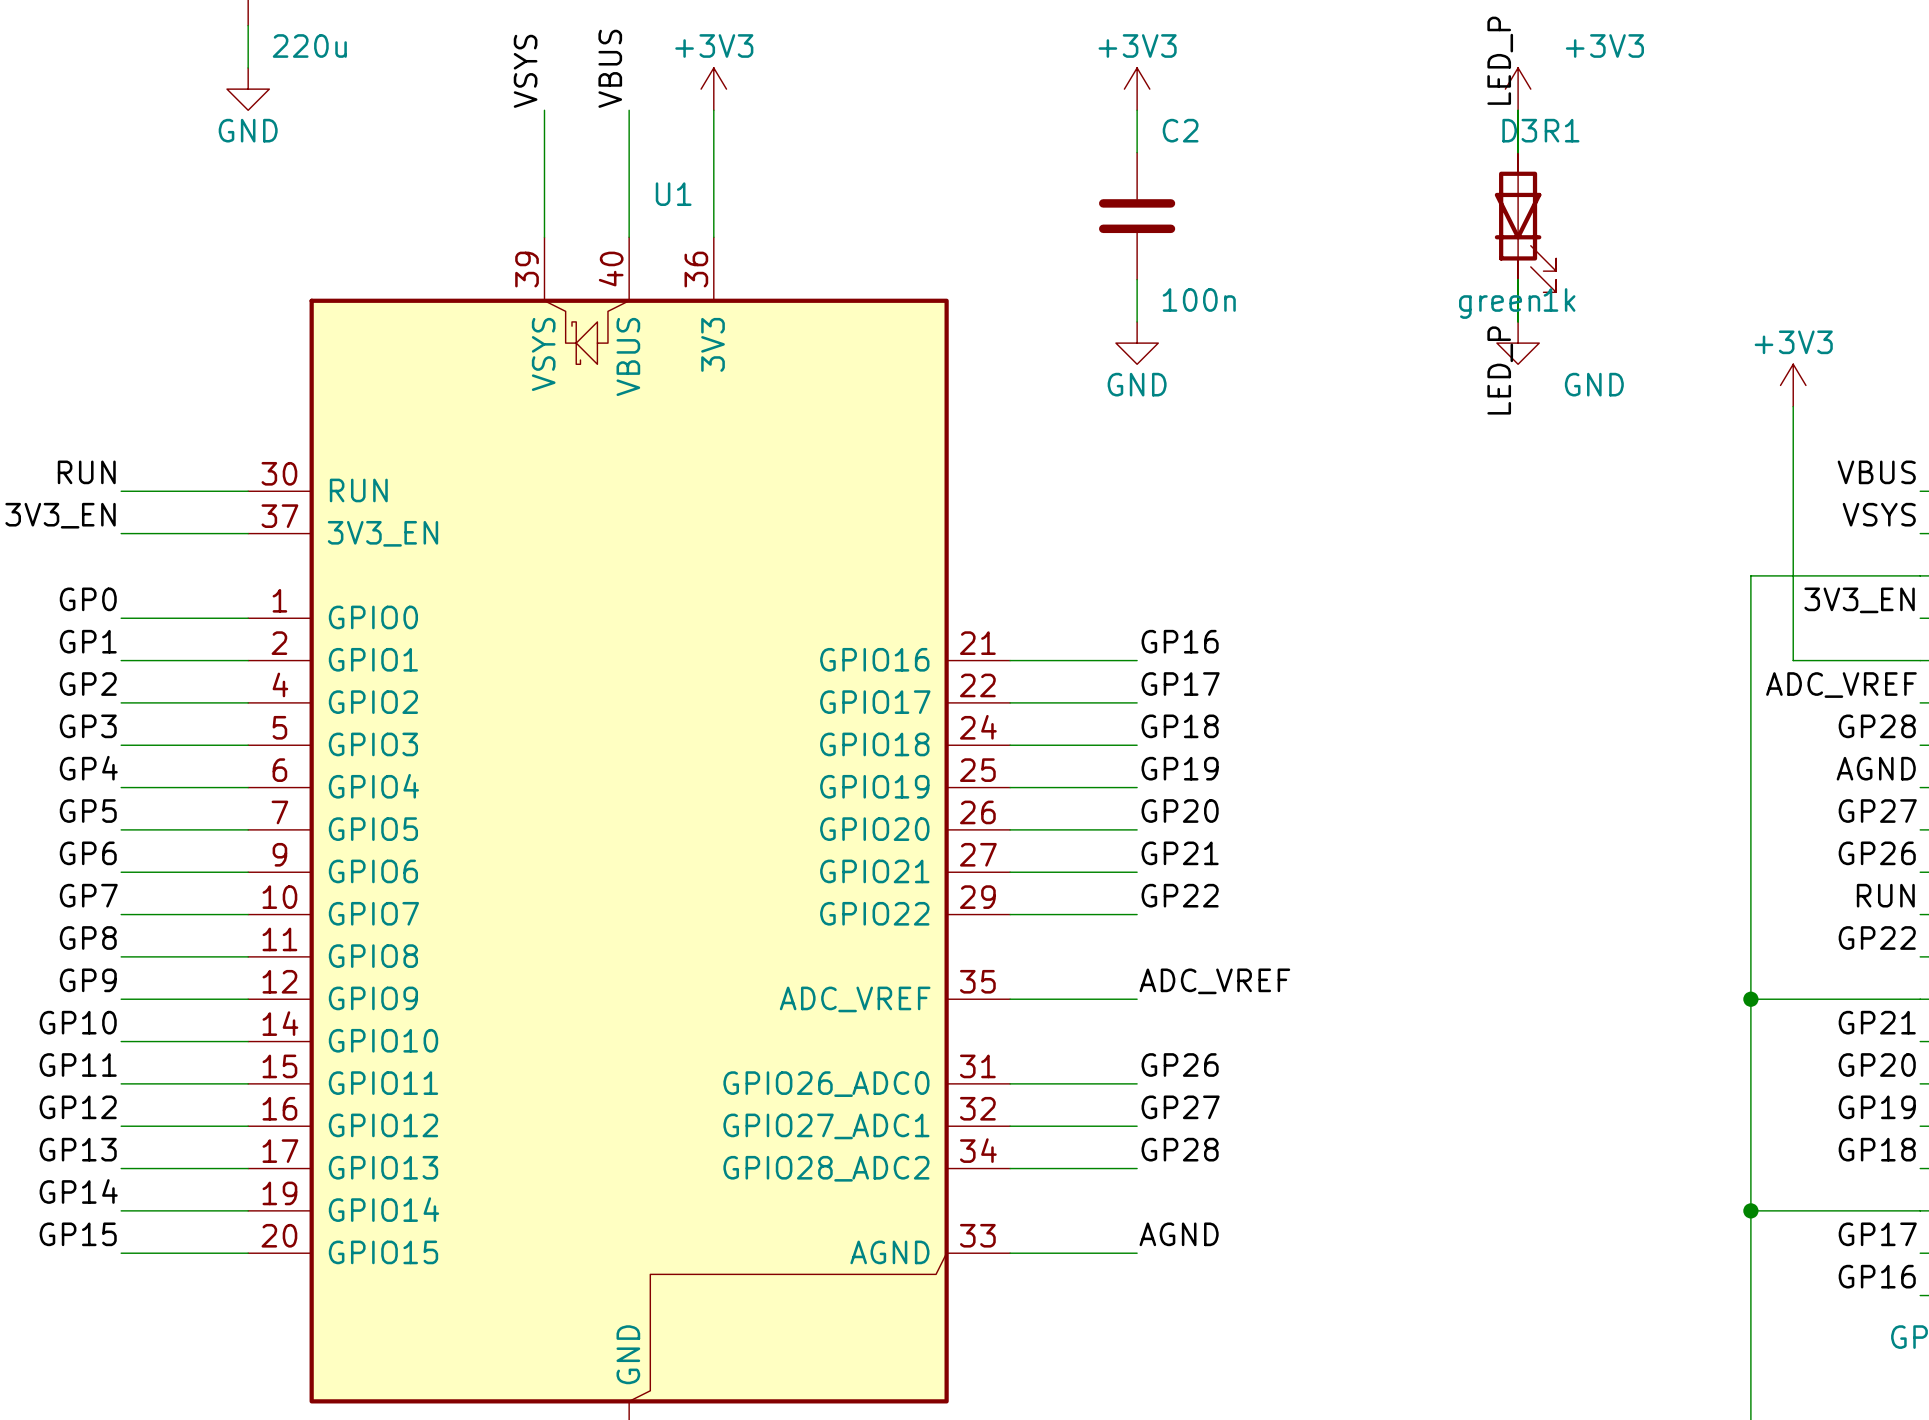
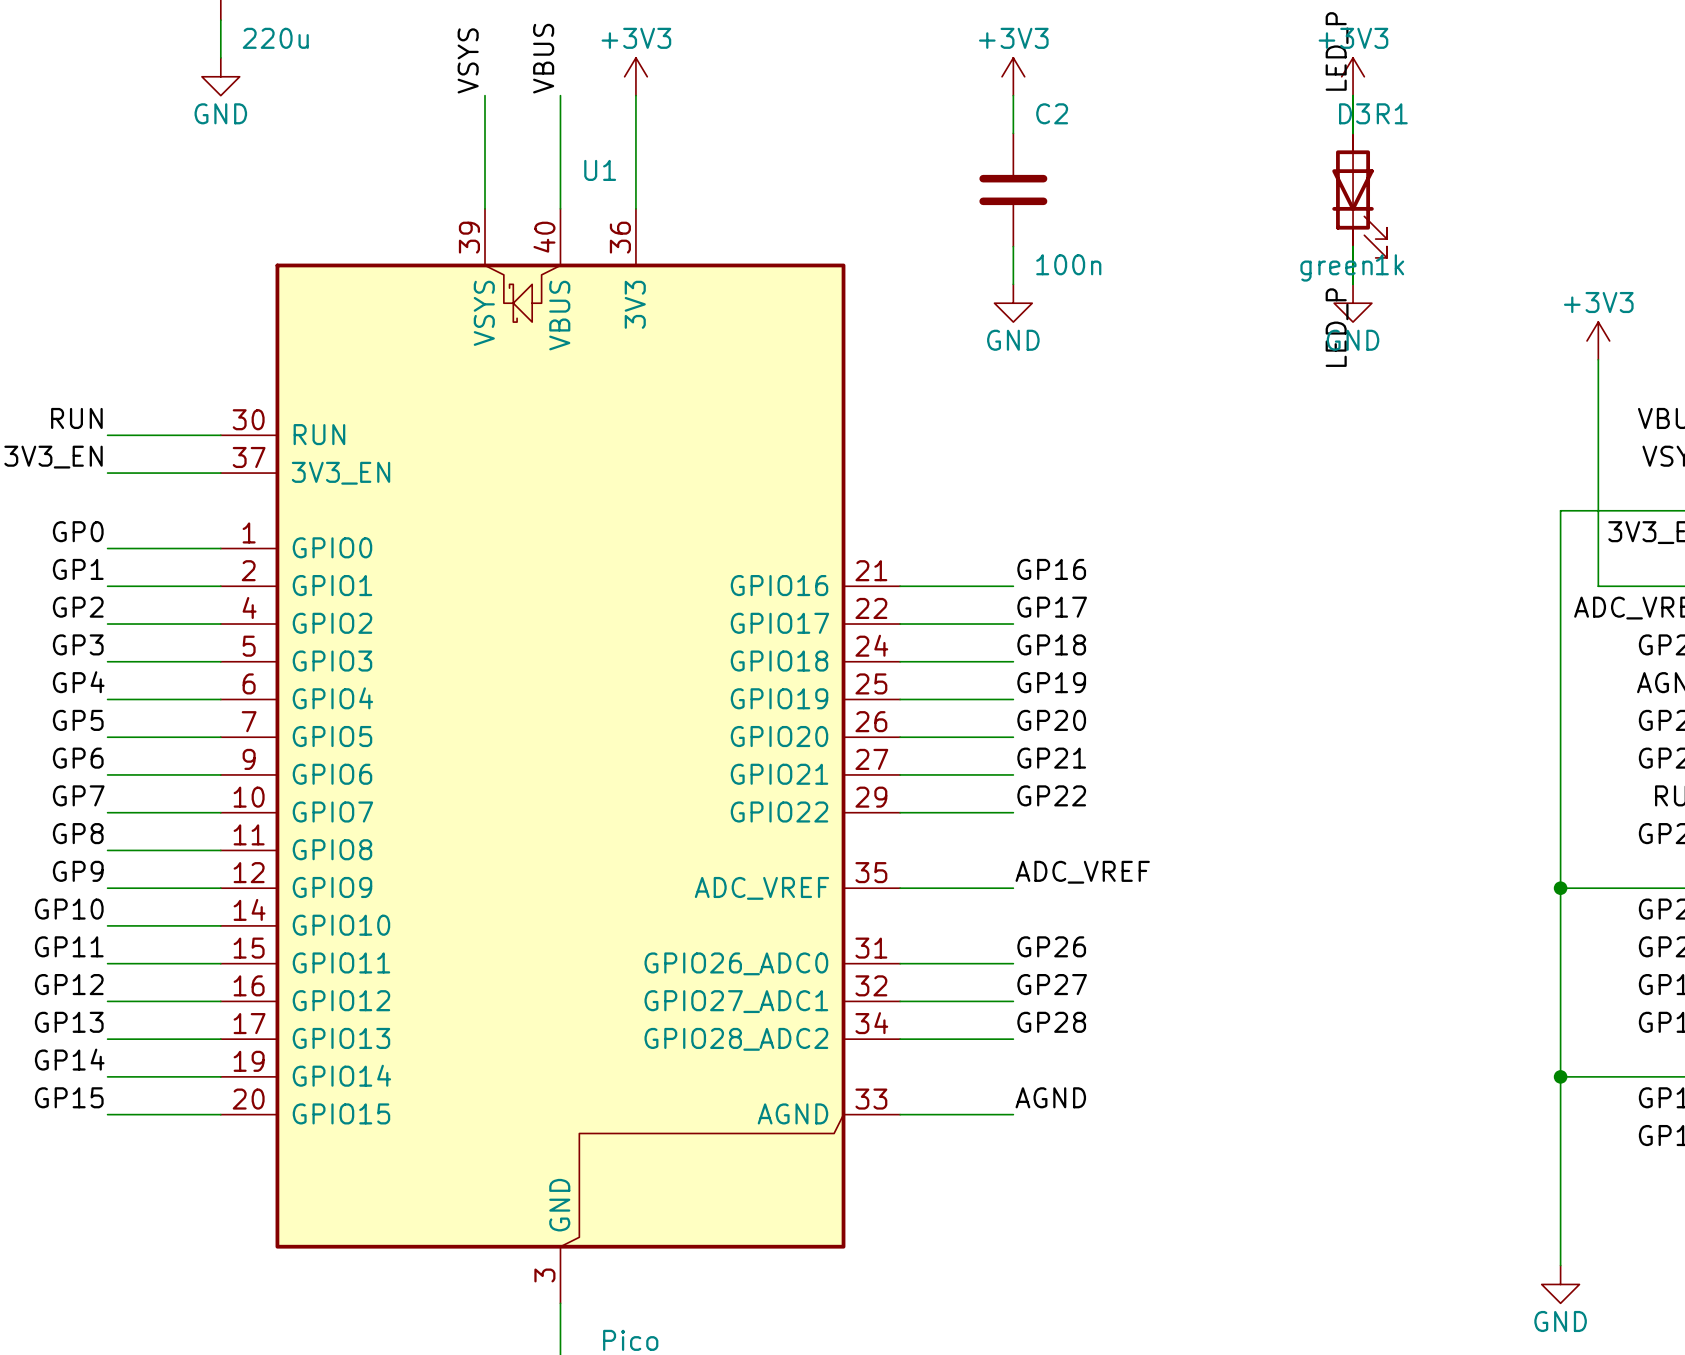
power symbol text position: +3V3 (1604, 46) -> +3V3 (1353, 38)
power symbol text position: GND (1594, 384) -> GND (1353, 340)

